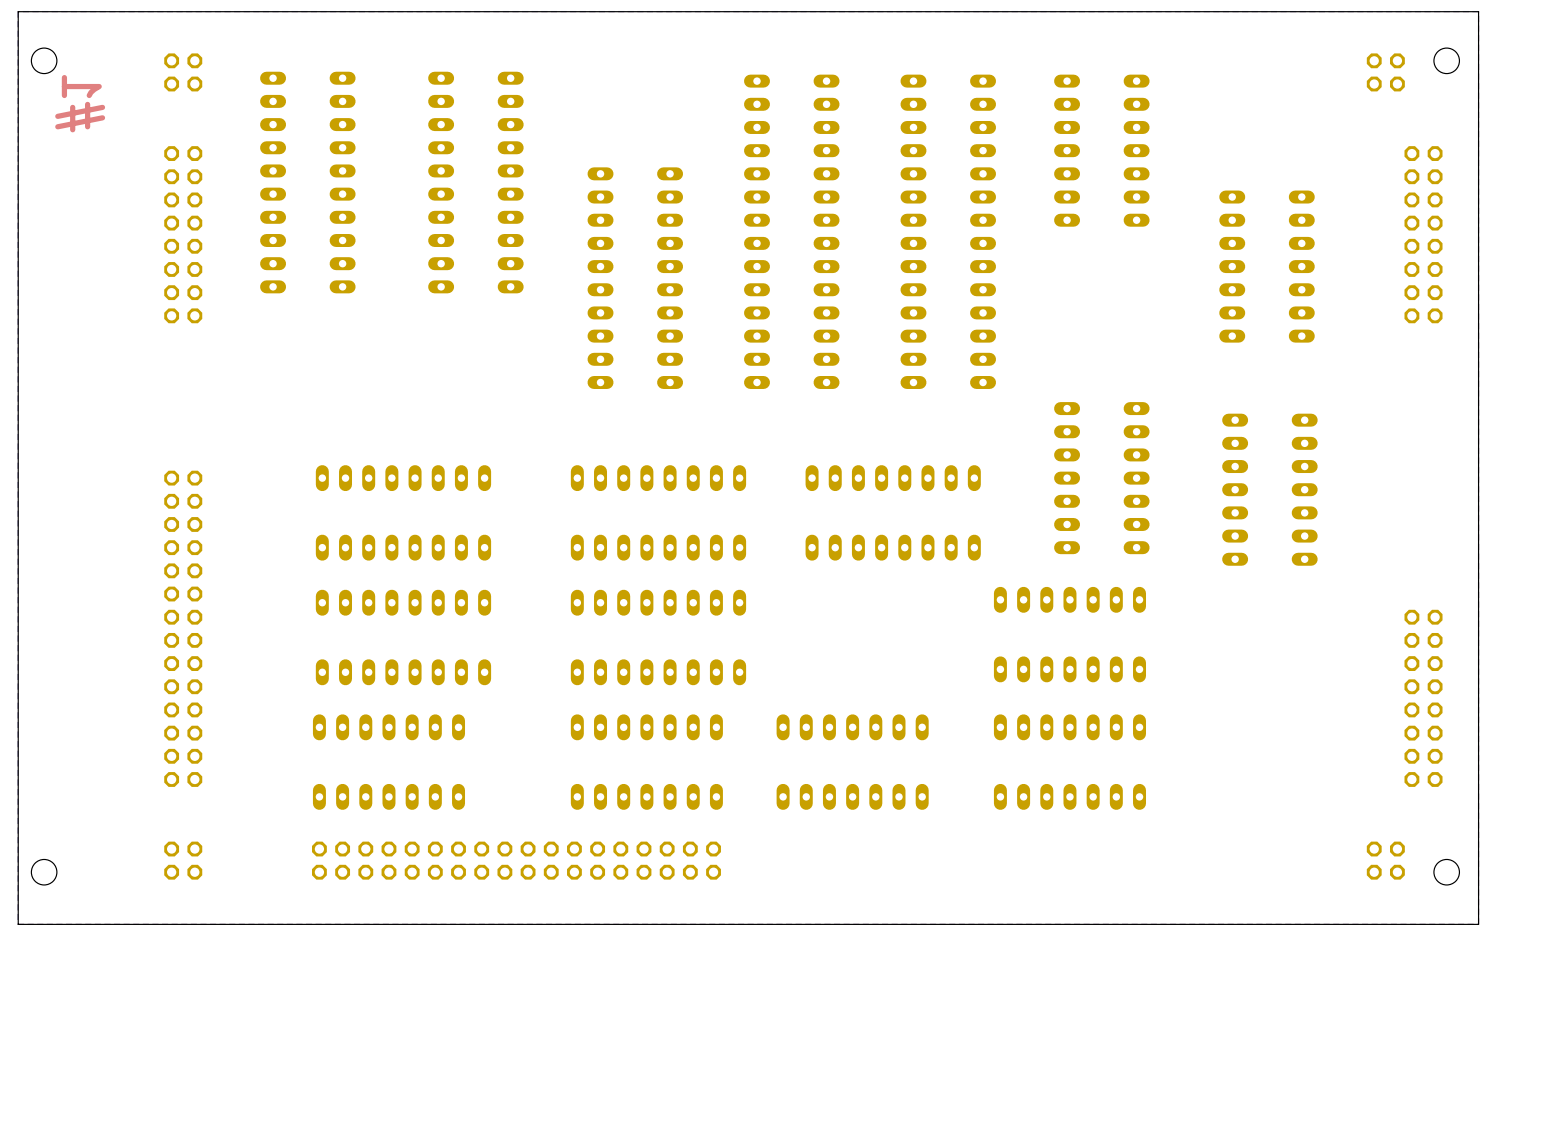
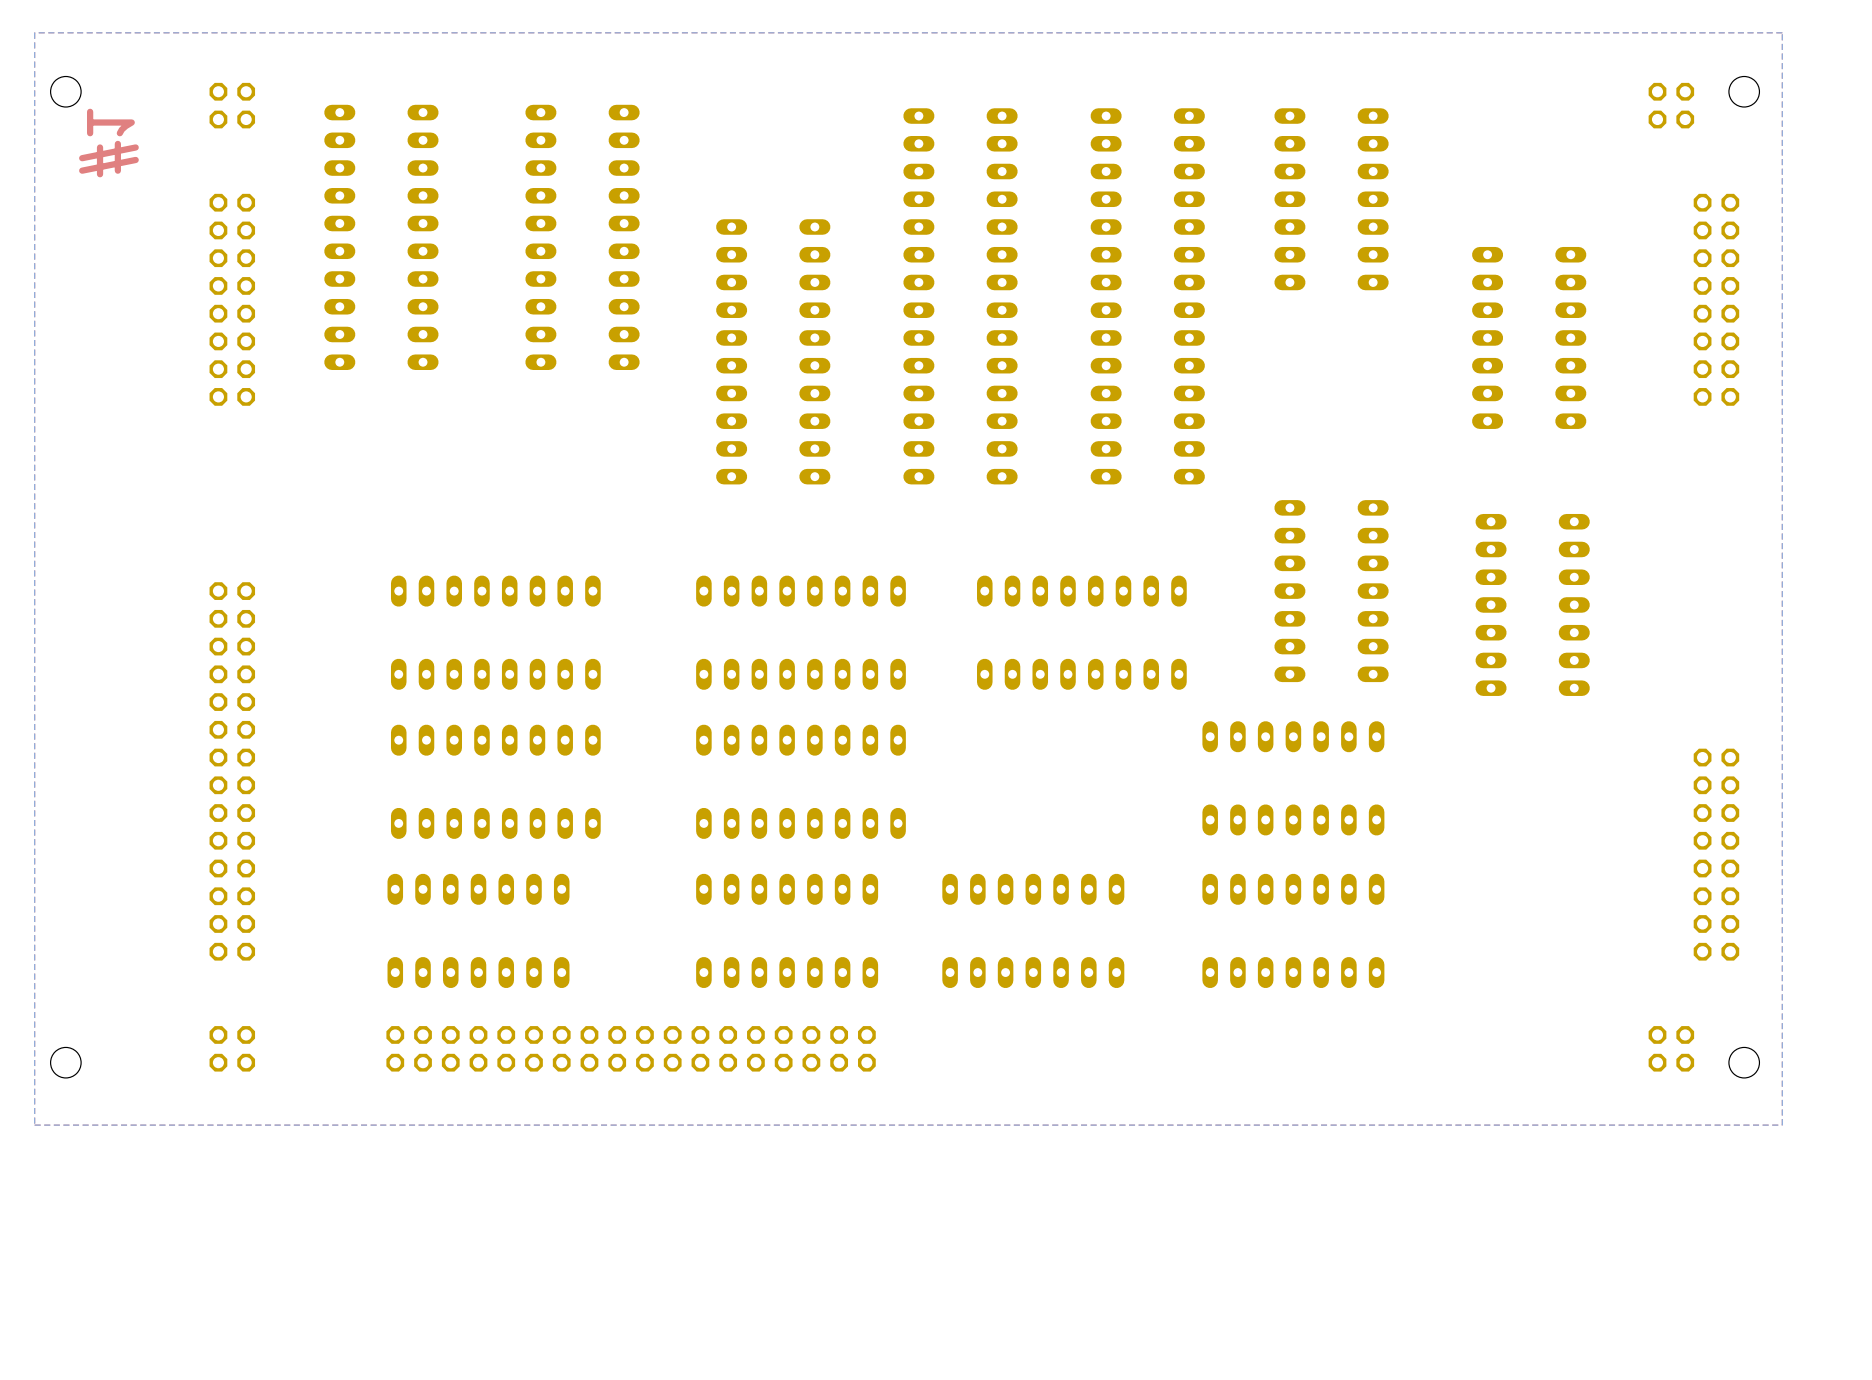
board edge: (1478, 11) (18, 11) (18, 924) (1478, 924) (1478, 11) -> none

